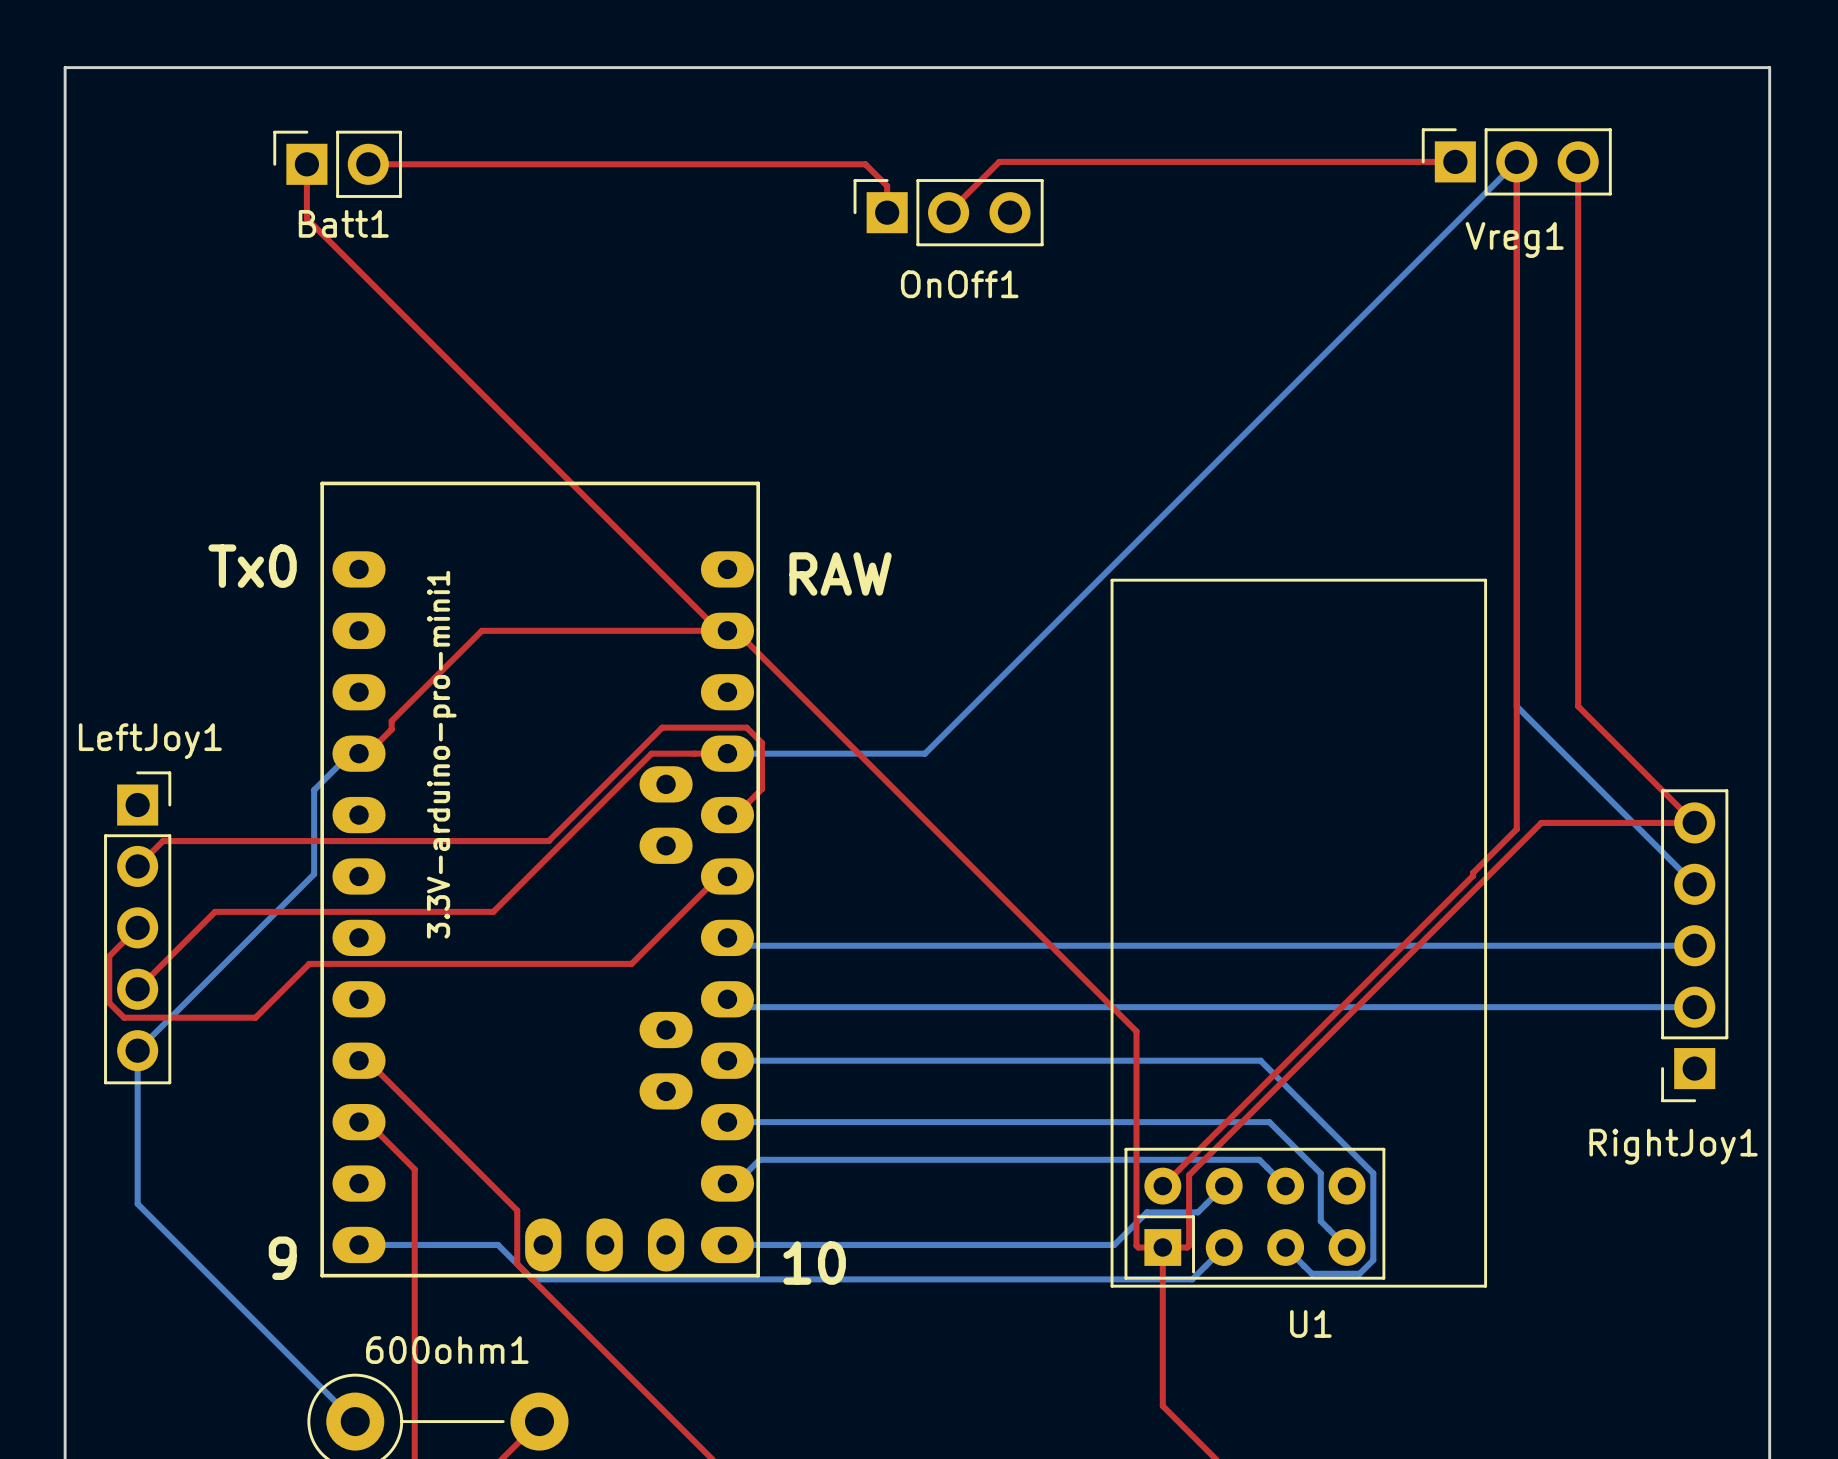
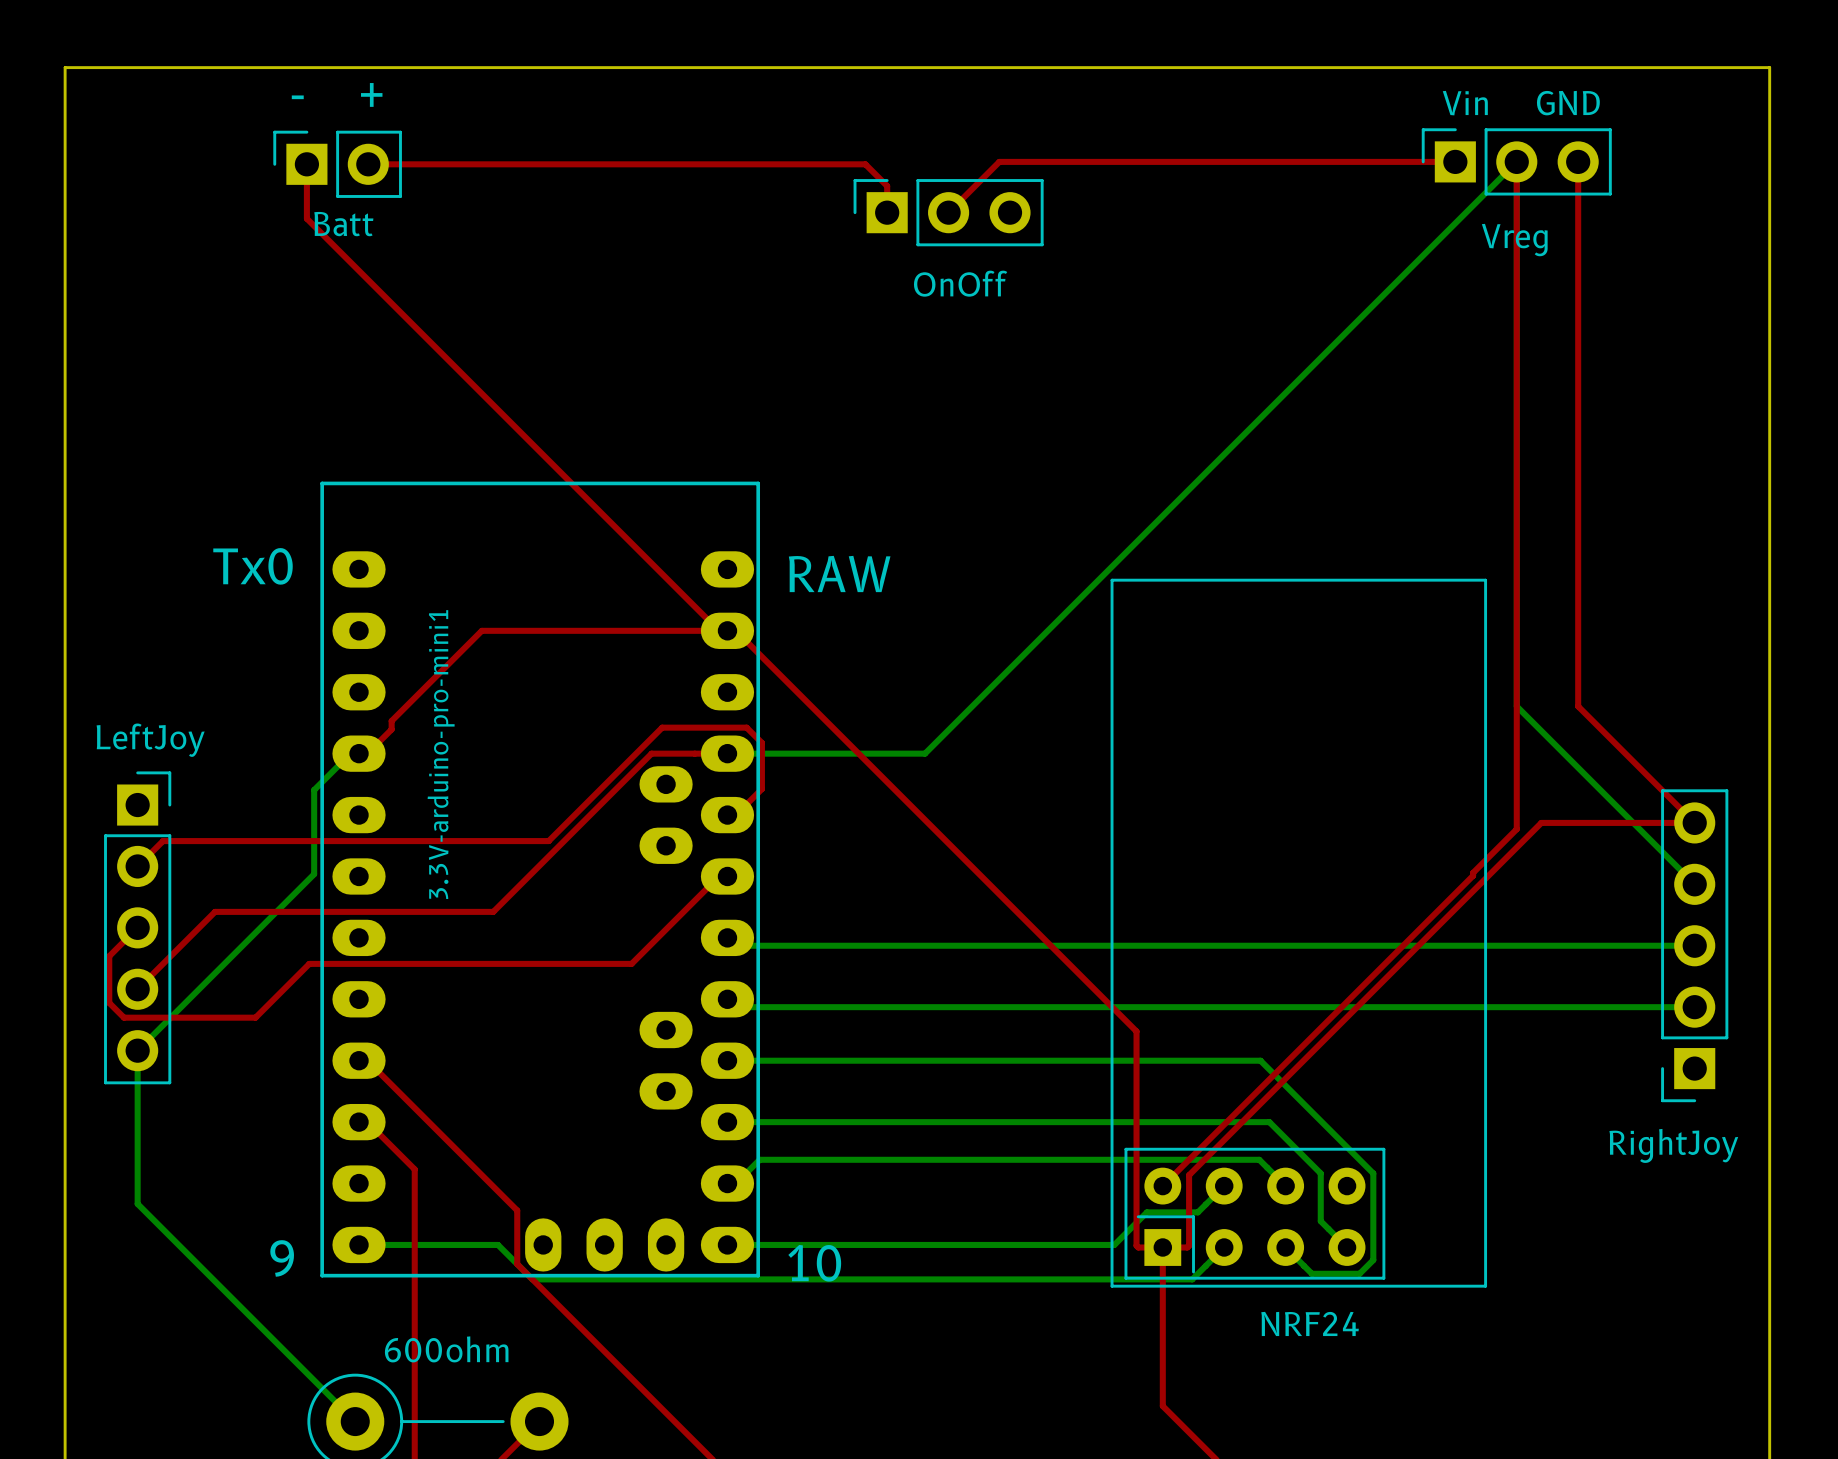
text: none -> - + (337, 94)
text: none -> Vin GND (1521, 103)
Batt1 name: Batt1 (343, 223) -> Batt (343, 224)
Vreg1 name: Vreg1 (1514, 239) -> Vreg (1514, 240)
OnOff1 name: OnOff1 (959, 284) -> OnOff (960, 283)
LeftJoy1 name: LeftJoy1 (150, 741) -> LeftJoy (150, 740)
RightJoy1 name: RightJoy1 (1673, 1146) -> RightJoy (1673, 1145)
U1 name: U1 (1310, 1323) -> NRF24 (1310, 1323)
600ohm1 name: 600ohm1 (447, 1350) -> 600ohm (446, 1349)

